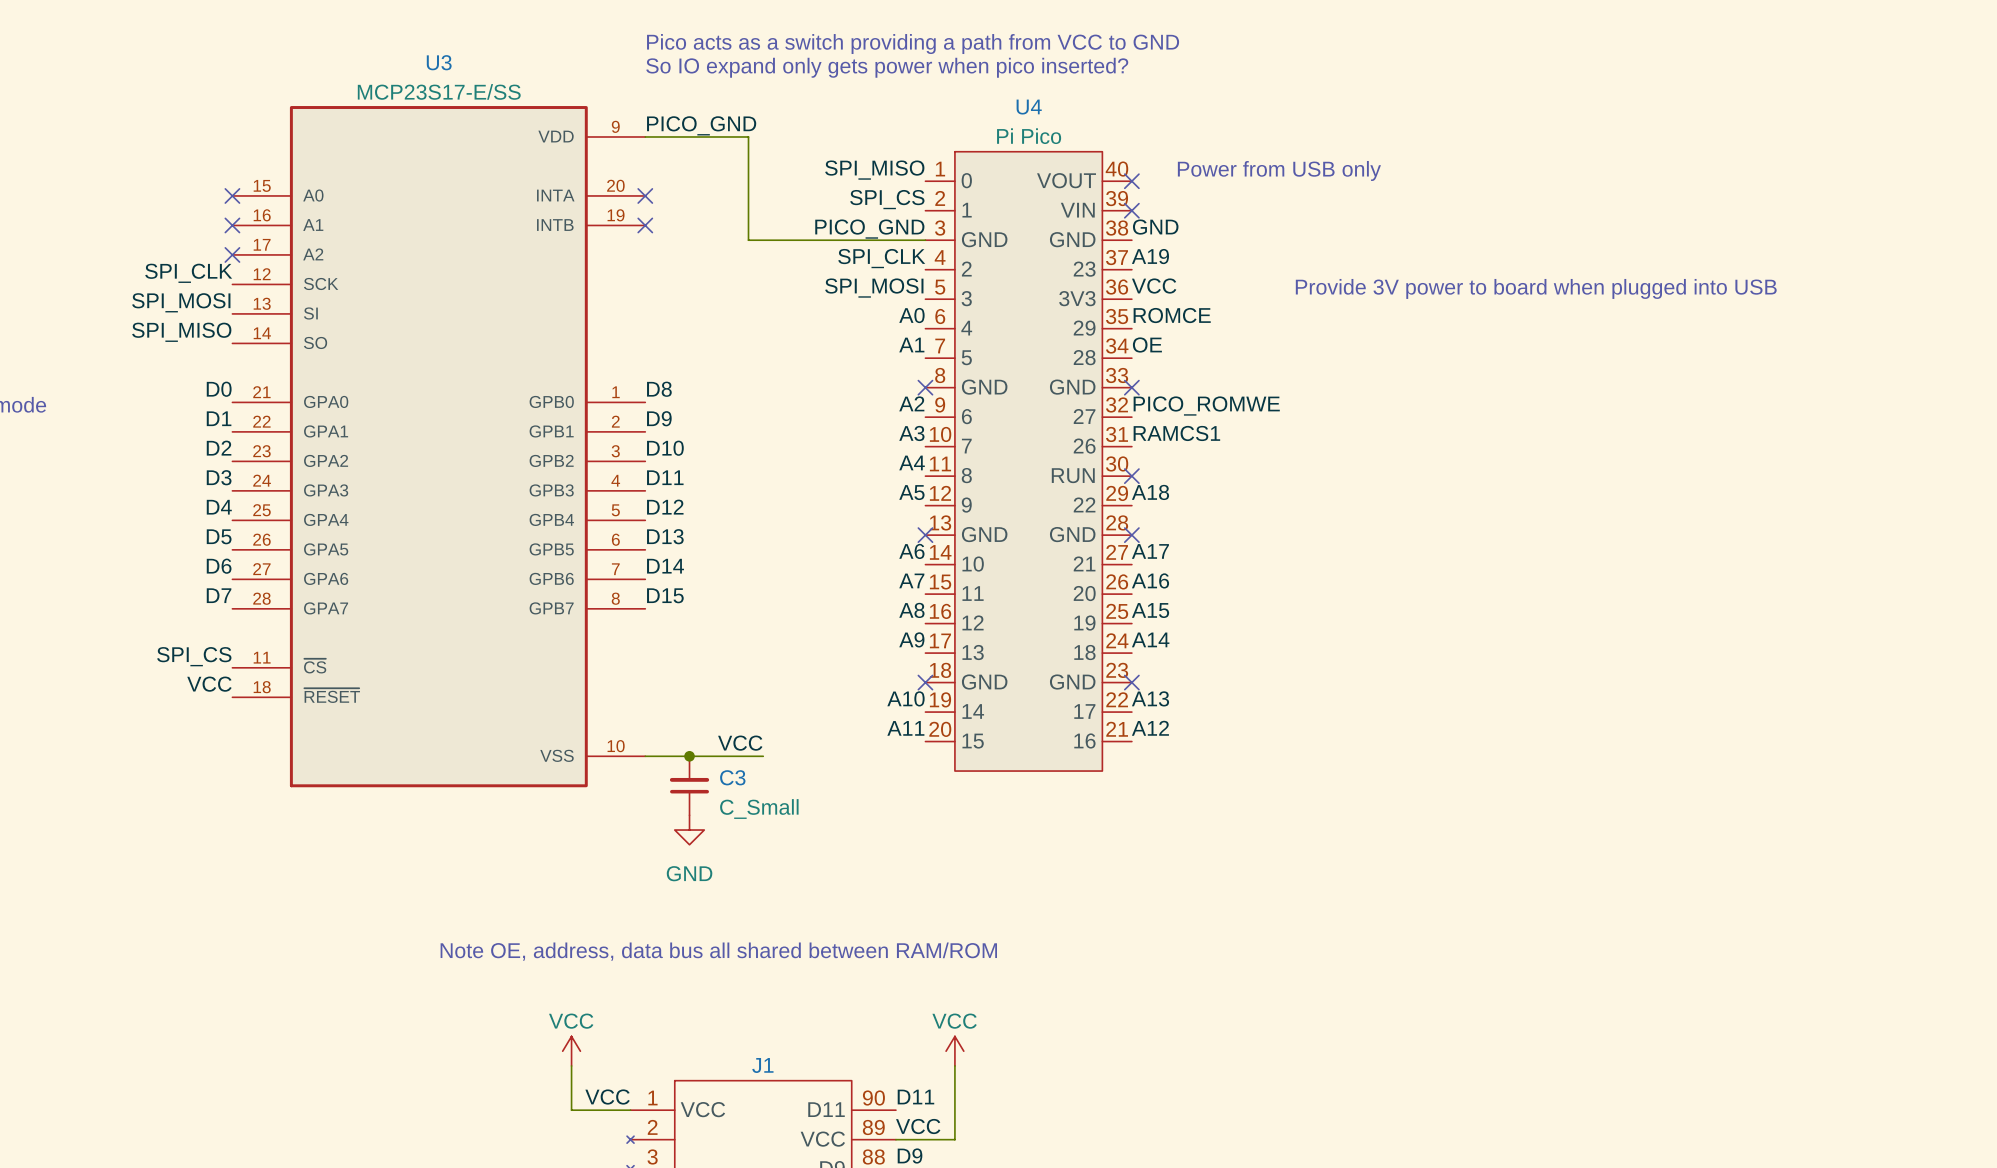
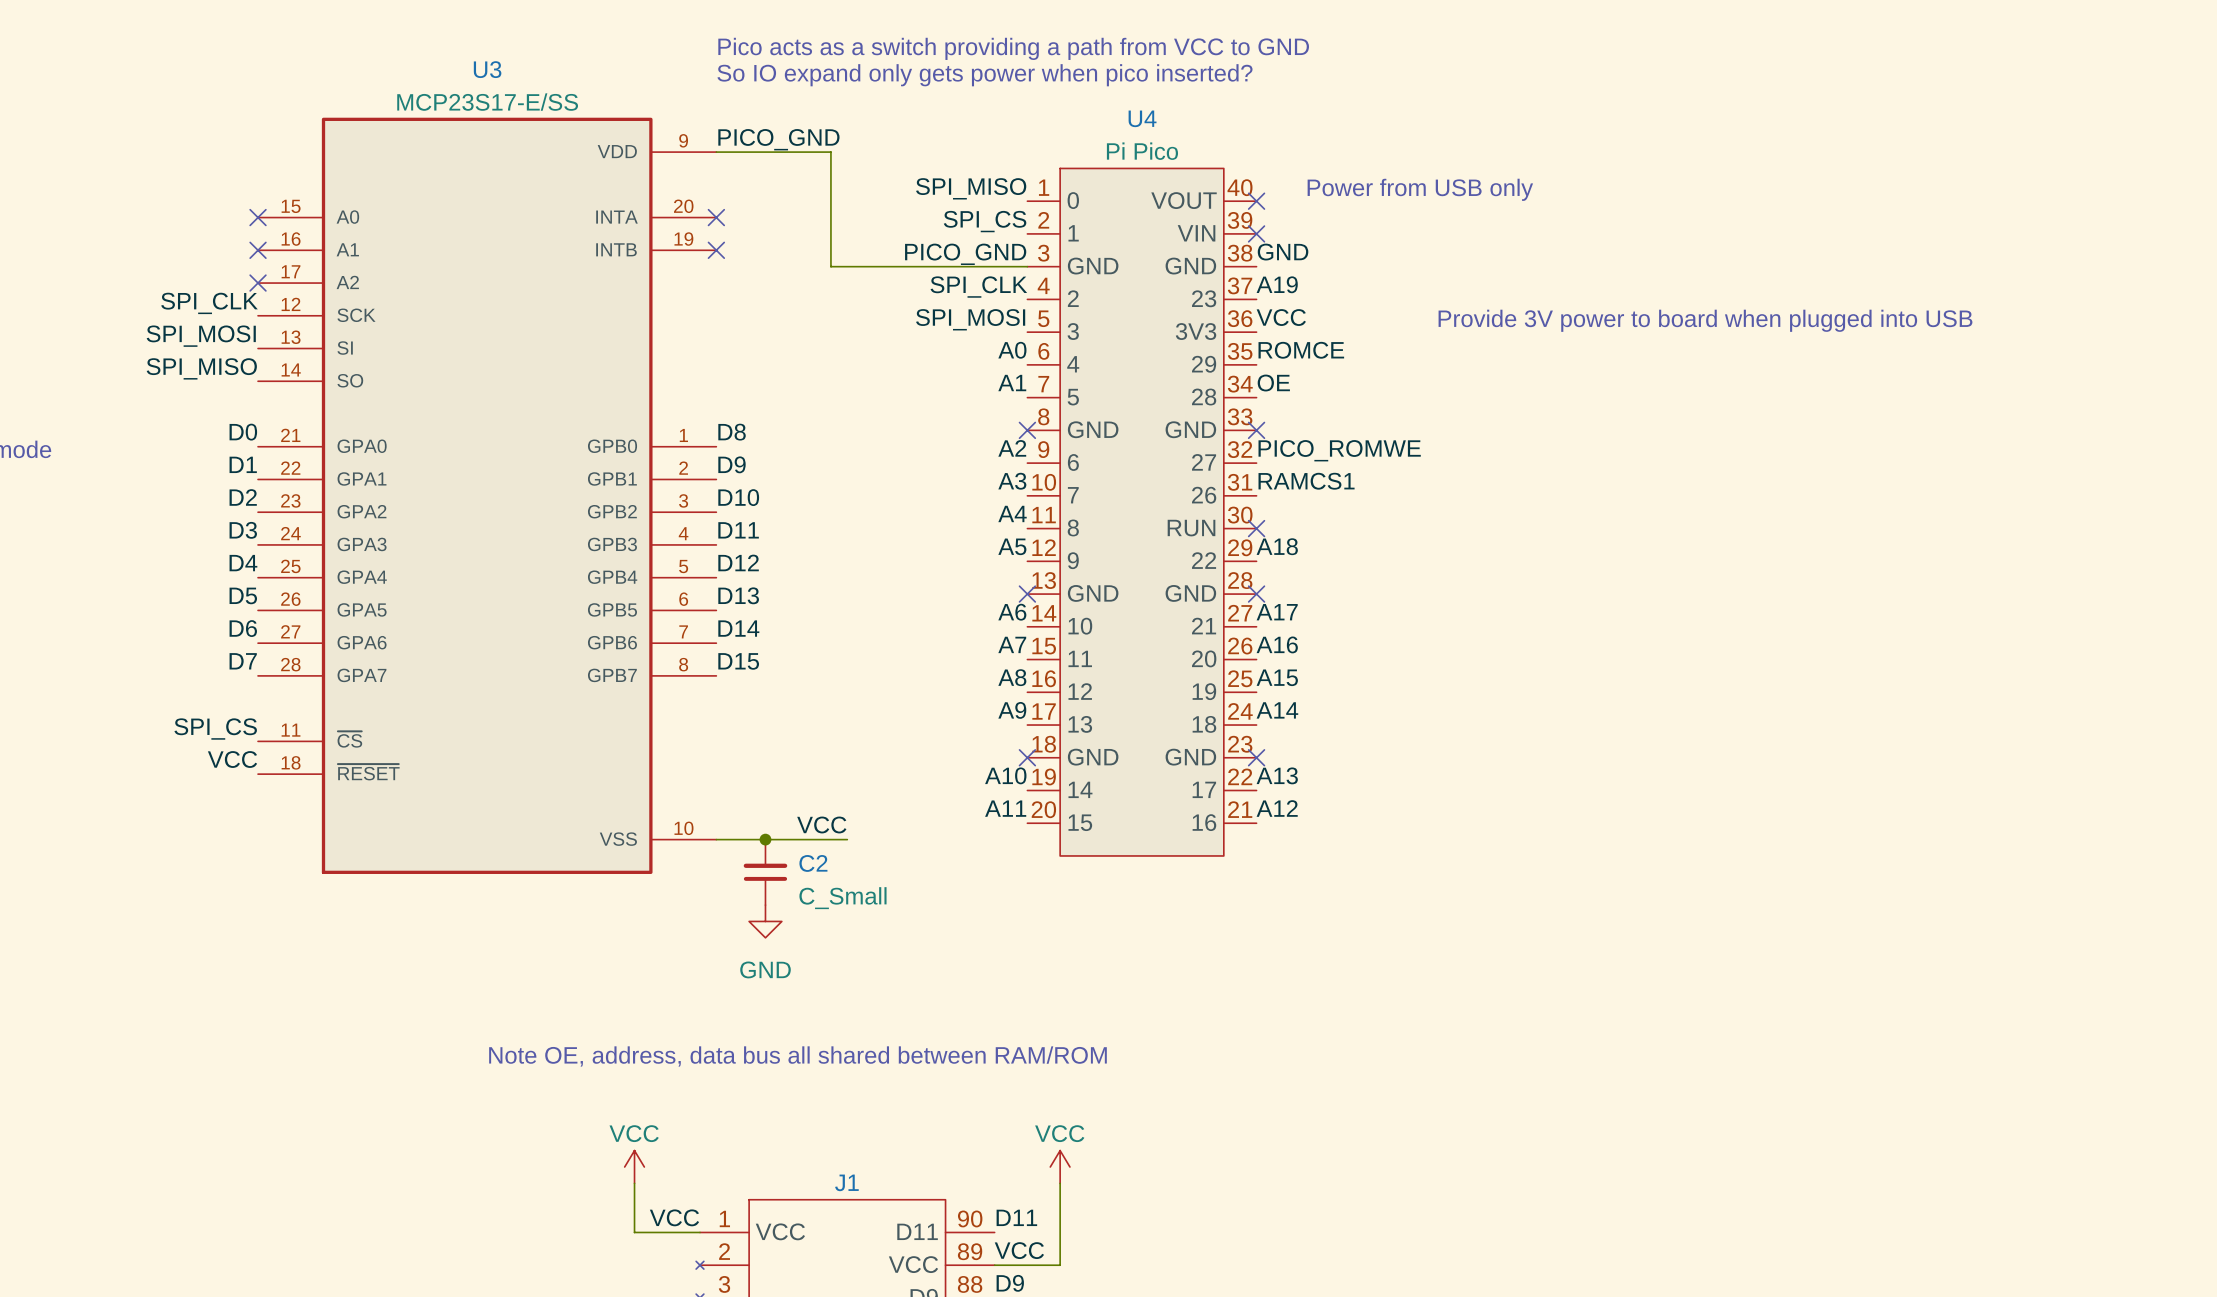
C3 name: C3 (732, 777) -> C2 (813, 863)

